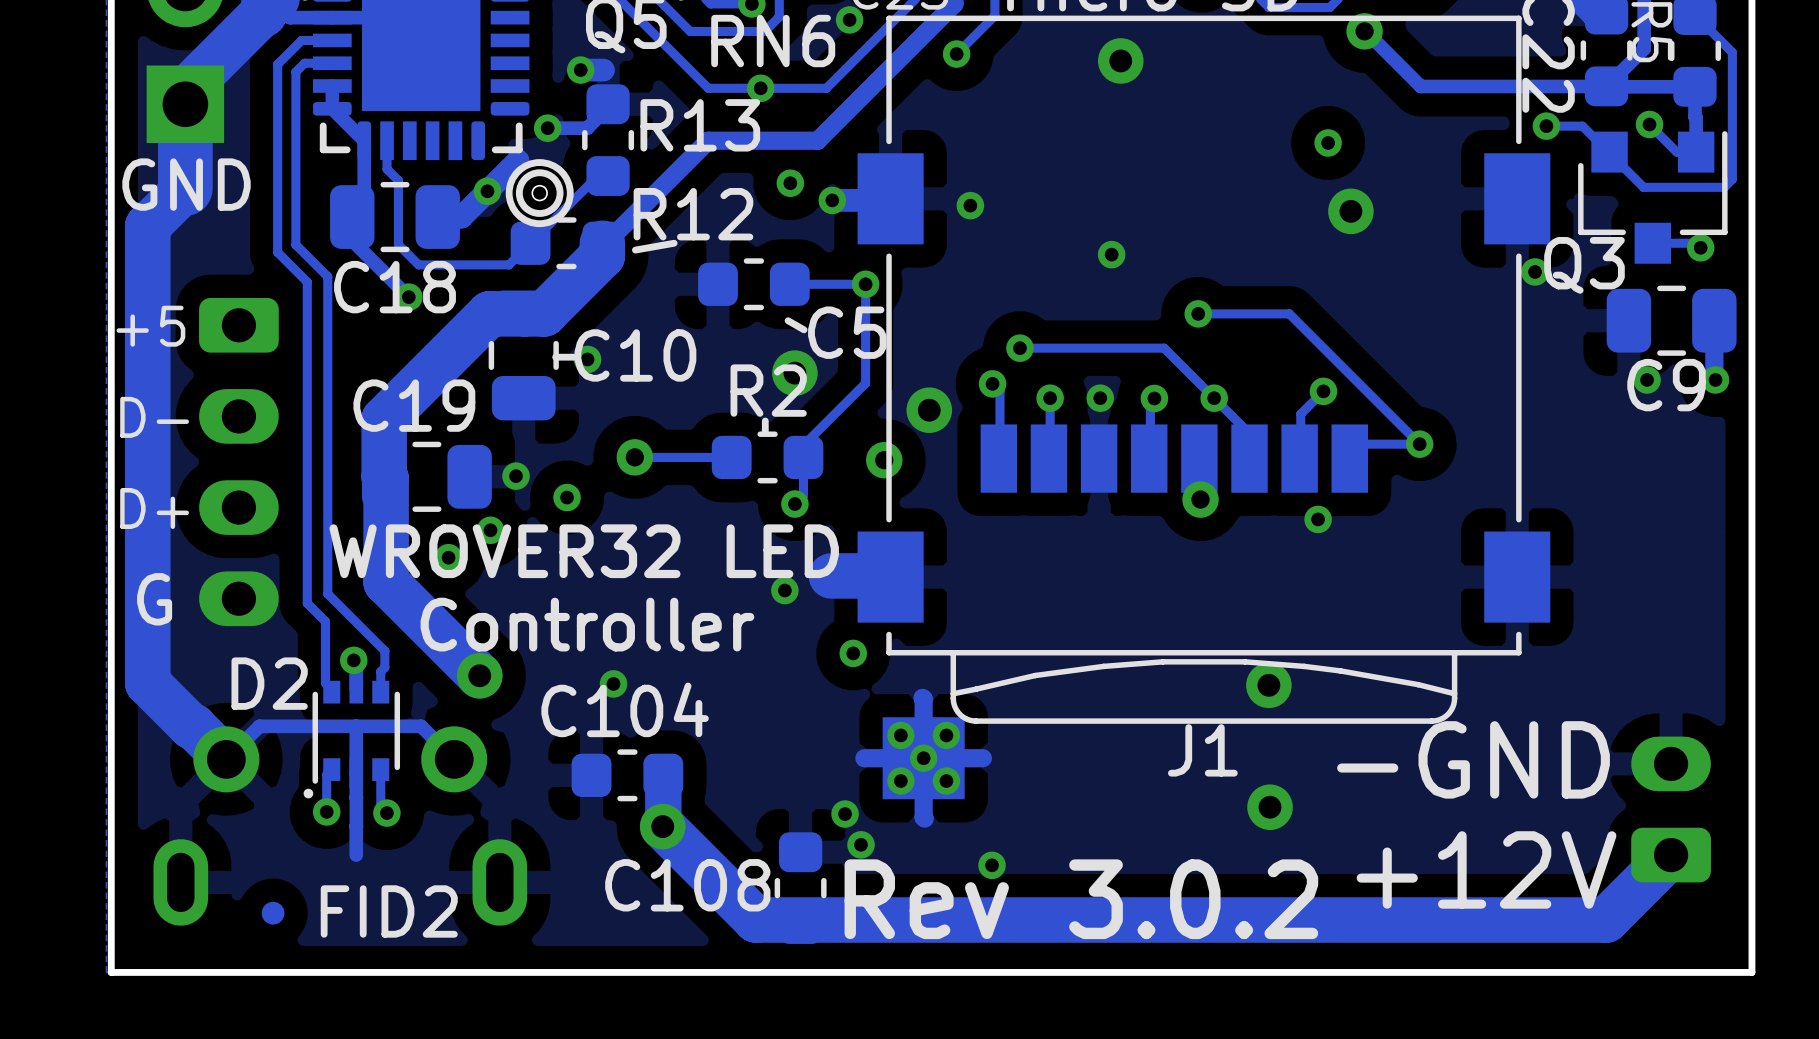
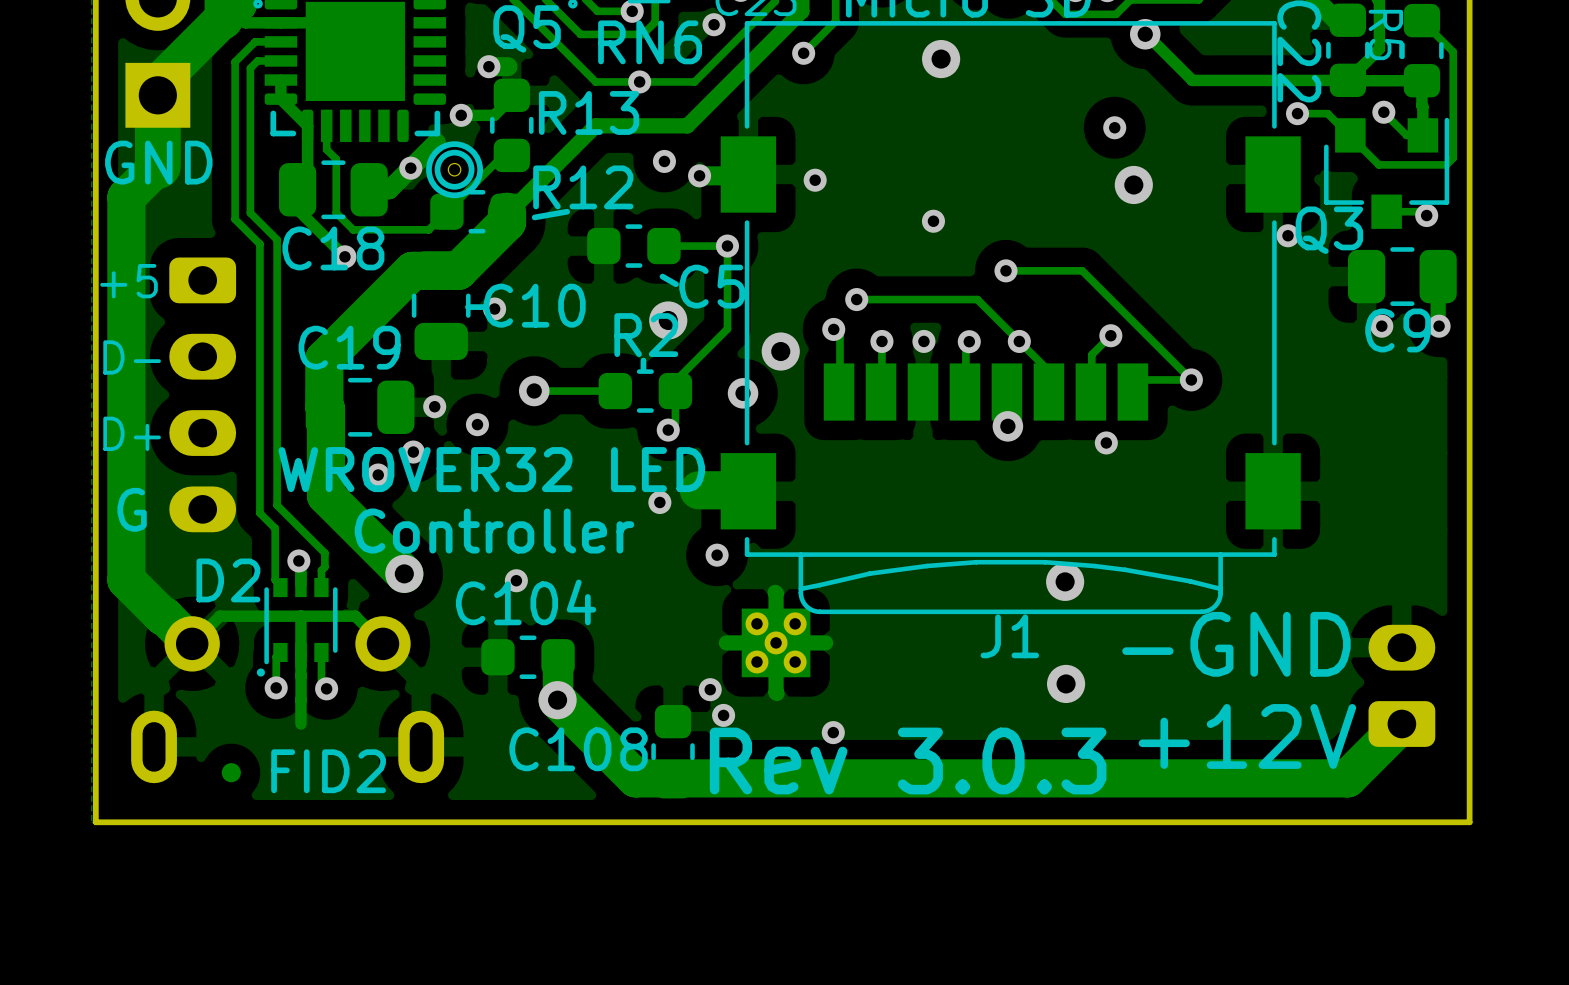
text: Rev 3.0.2 (1081, 899) -> Rev 3.0.3 (908, 760)

